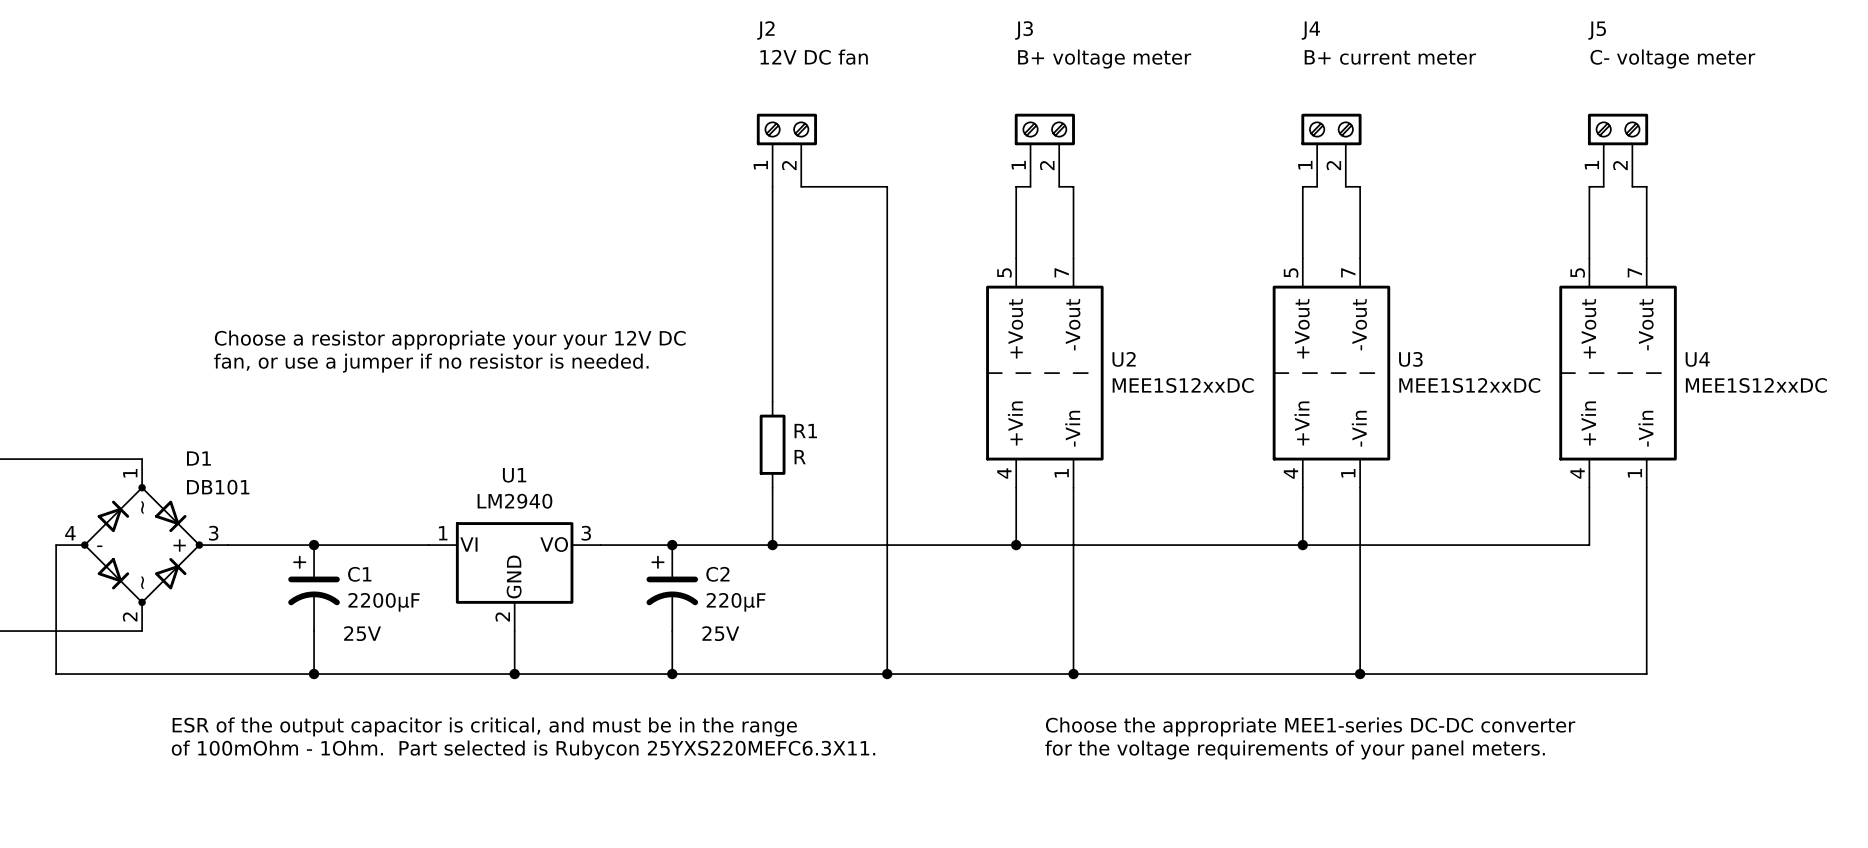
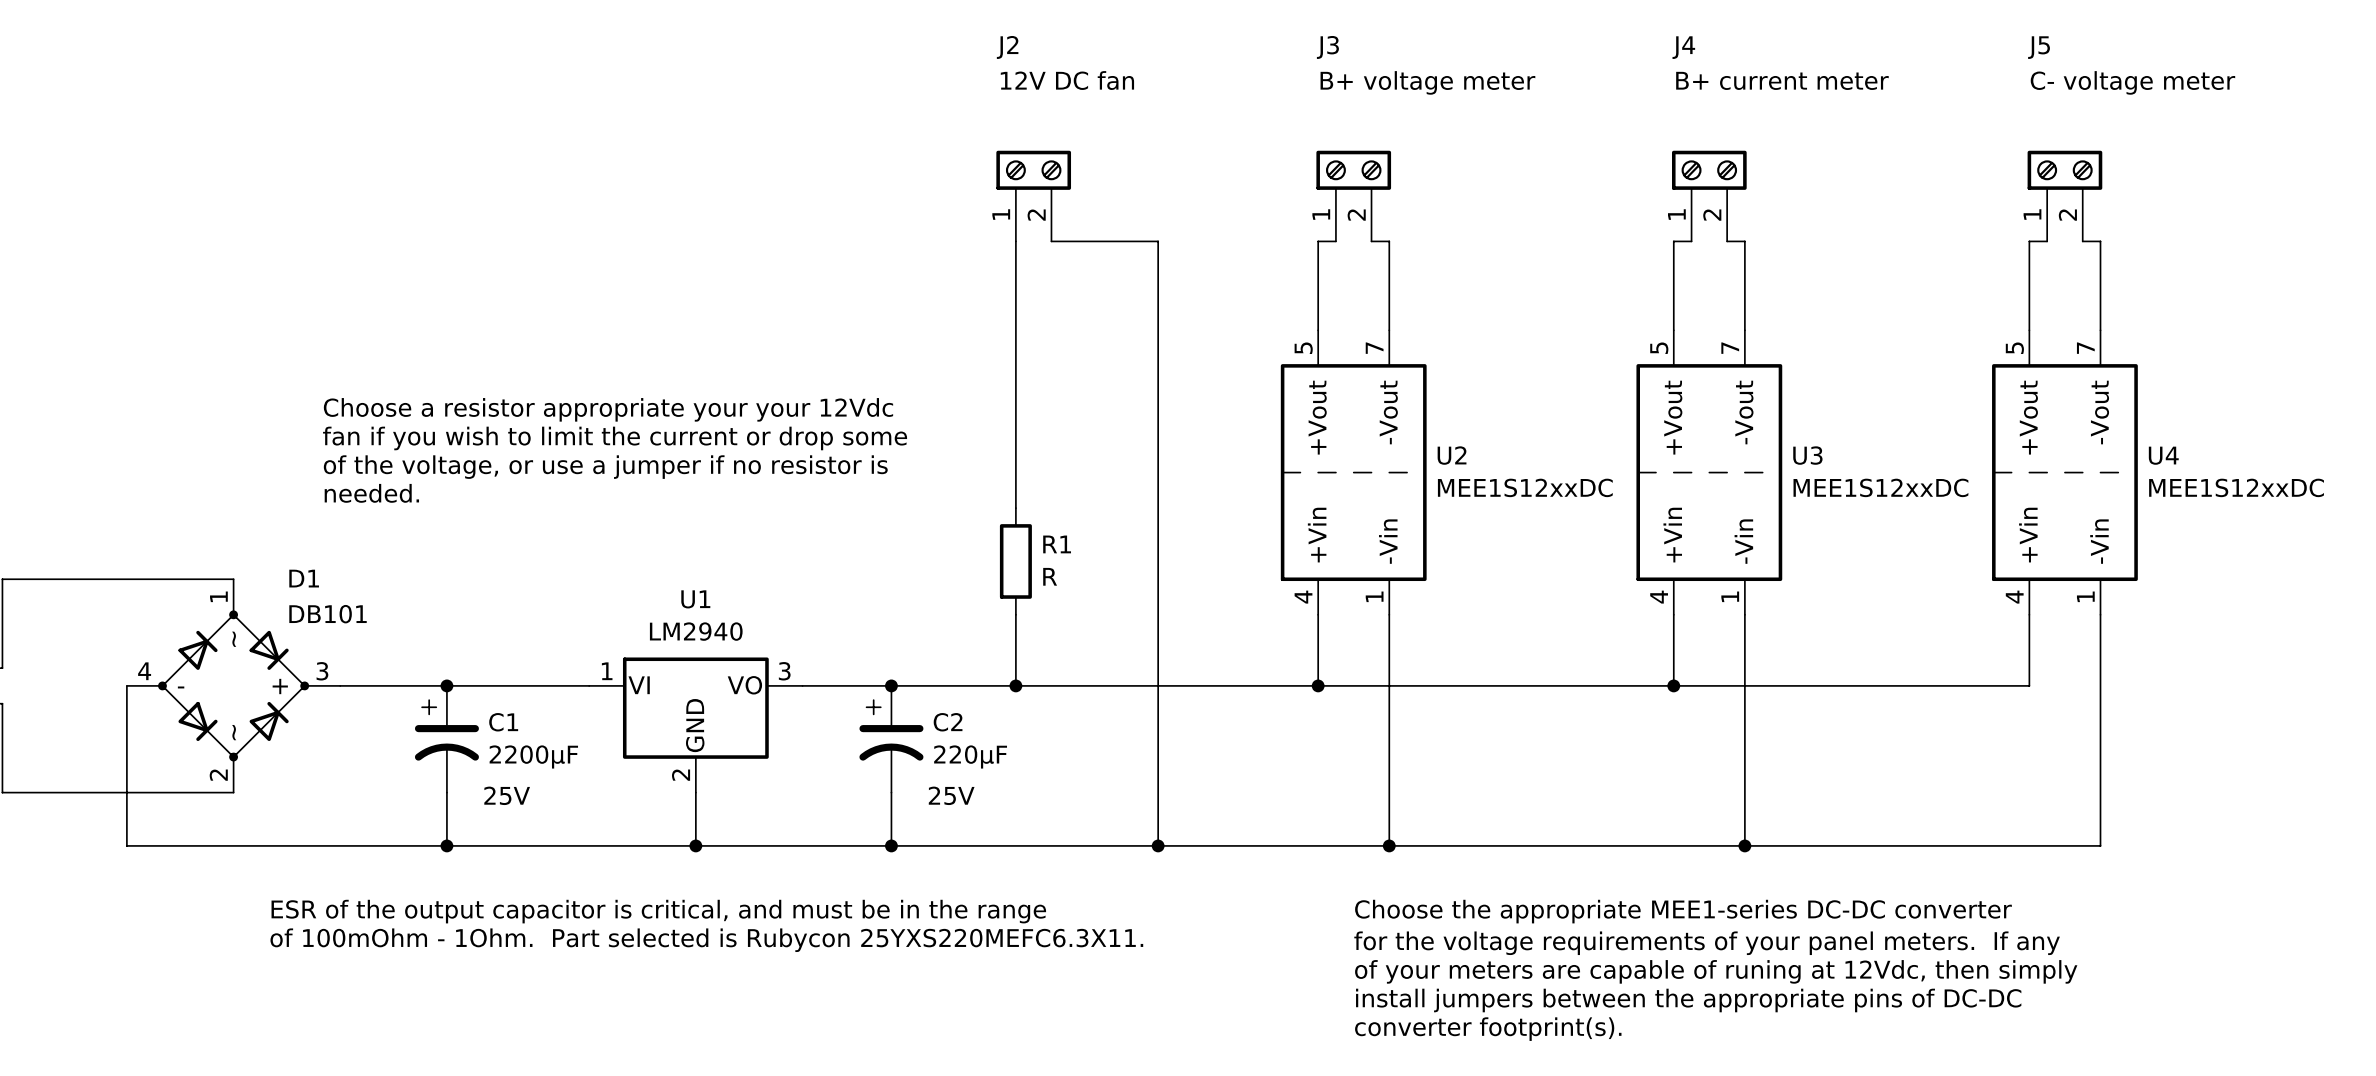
text: none -> Choose a resistor appropriate your your 12Vdc (608, 409)
text: Choose a resistor appropriate your your 12V DC (450, 340) -> fan if you wish to limit the current or drop some (615, 438)
text: fan, or use a jumper if no resistor is needed. (431, 363) -> of the voltage, or use a jumper if no resistor is (605, 467)
text: none -> needed. (371, 493)
text: for the voltage requirements of your panel meters. (1295, 750) -> for the voltage requirements of your panel meters. If any (1707, 943)
text: none -> of your meters are capable of runing at 12Vdc, then simply (1716, 971)
text: none -> install jumpers between the appropriate pins of DC-DC (1688, 1000)
text: none -> converter footprint(s). (1488, 1029)

